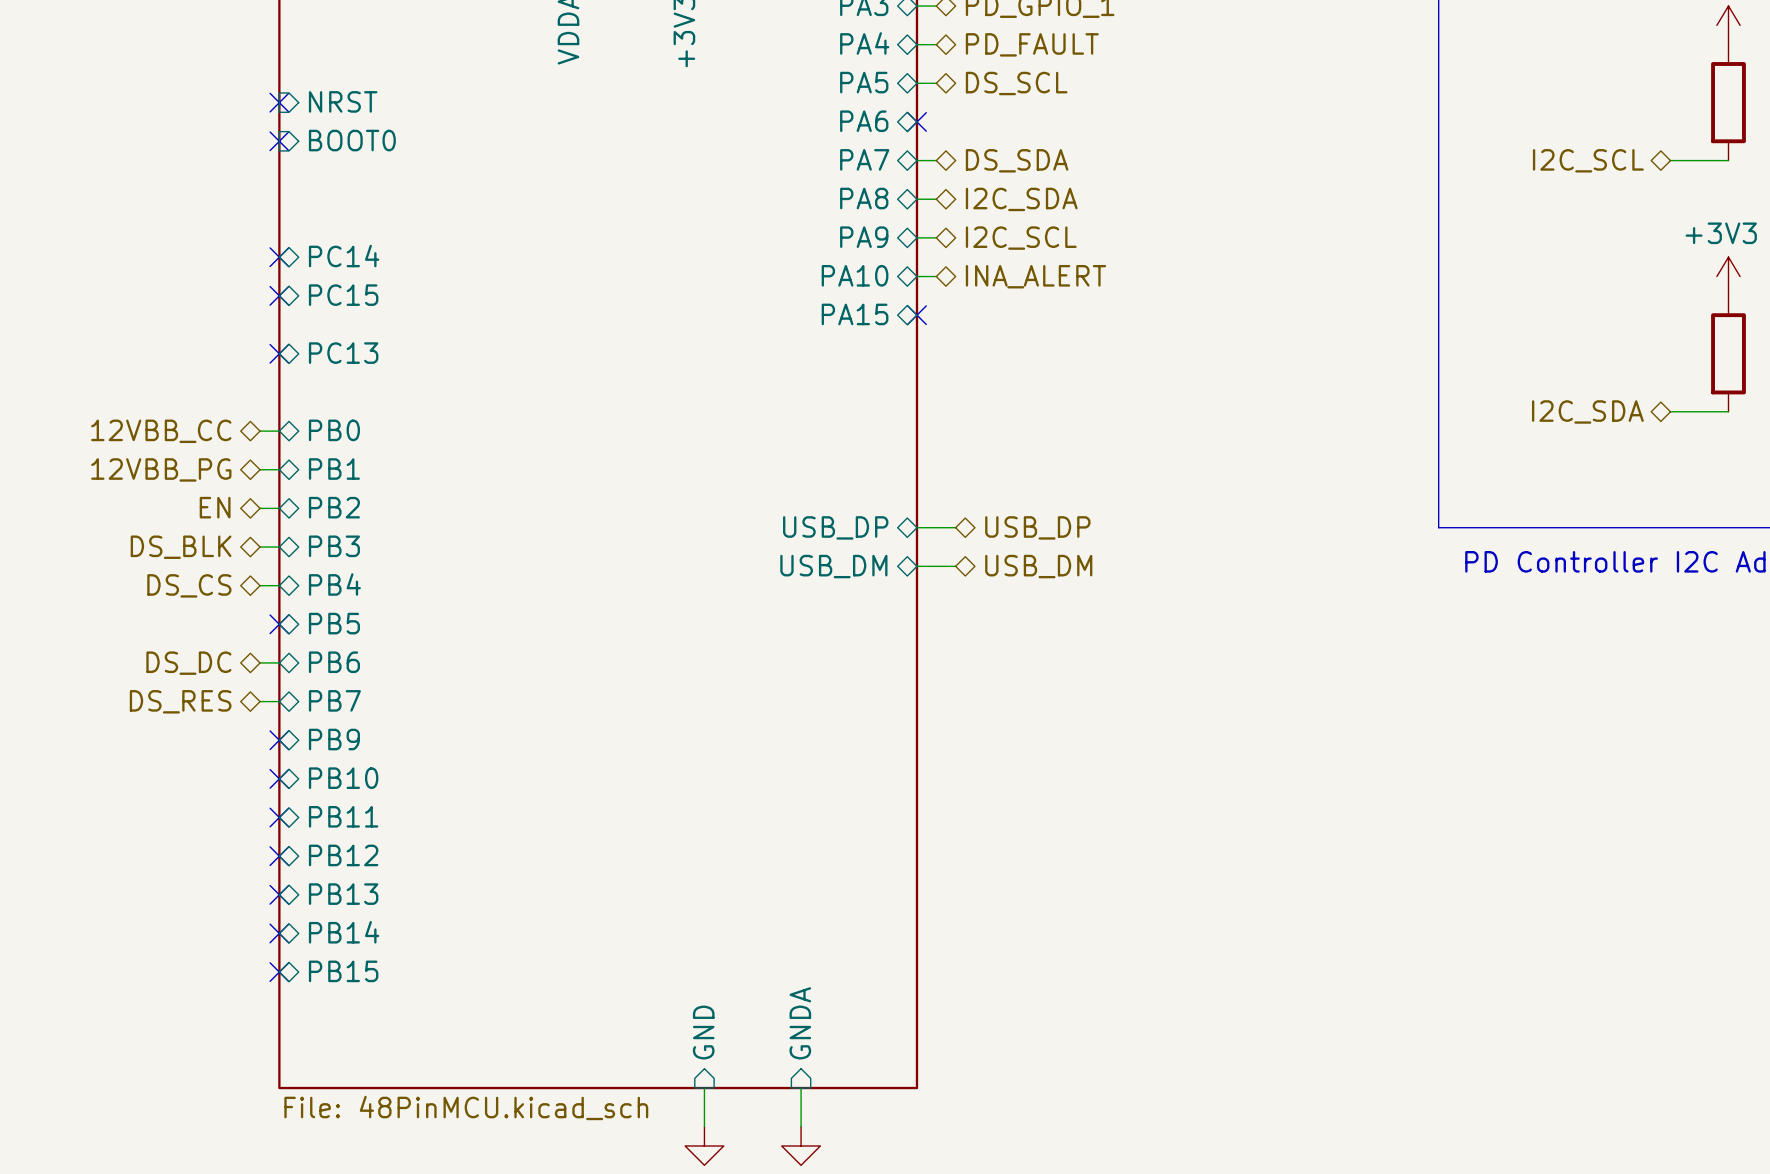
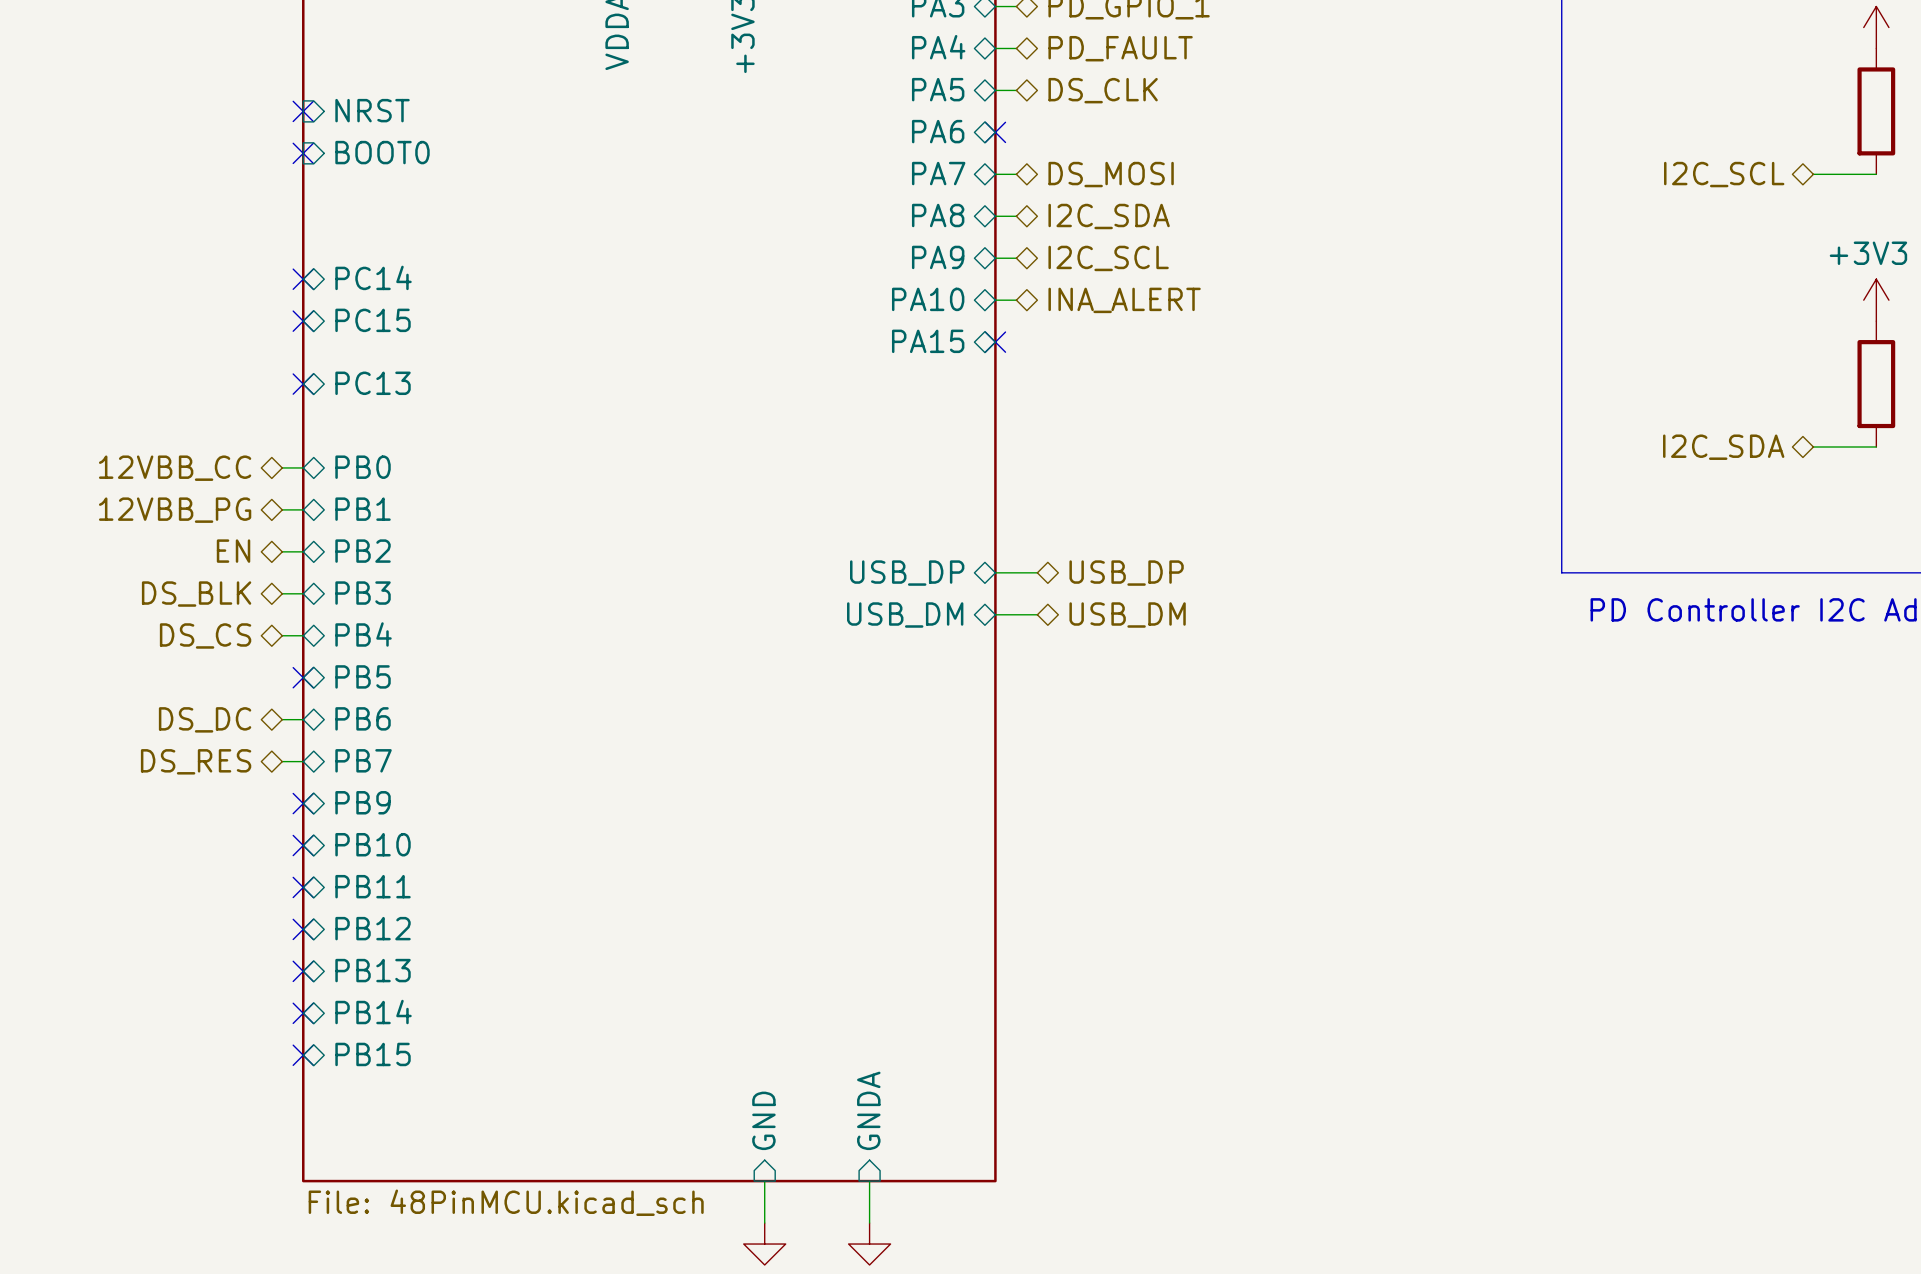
hierarchical label: DS_SCL (1016, 83) -> DS_CLK (1103, 90)
hierarchical label: DS_SDA (1017, 160) -> DS_MOSI (1111, 174)

